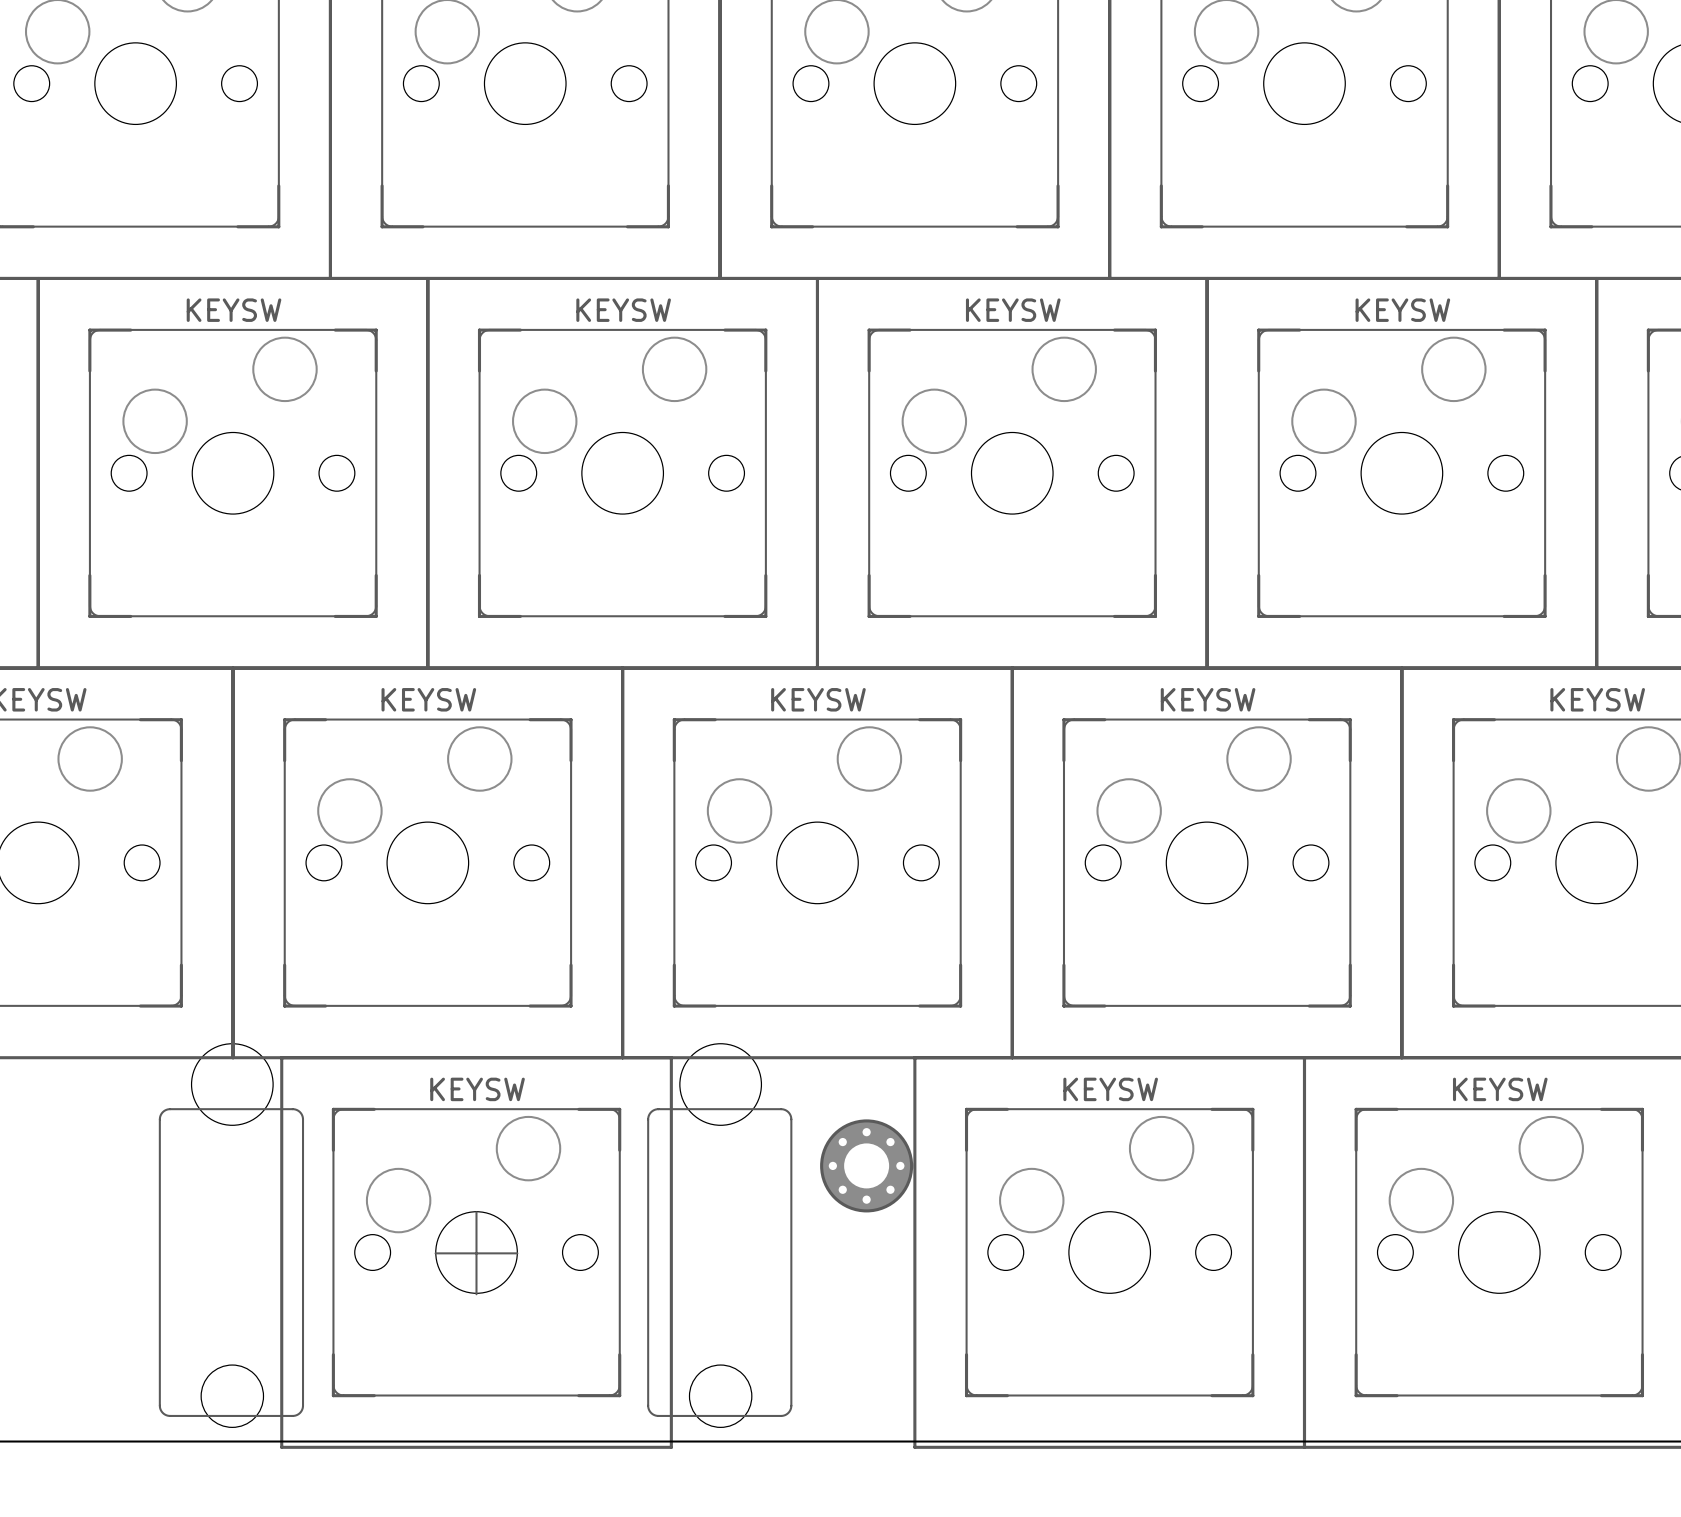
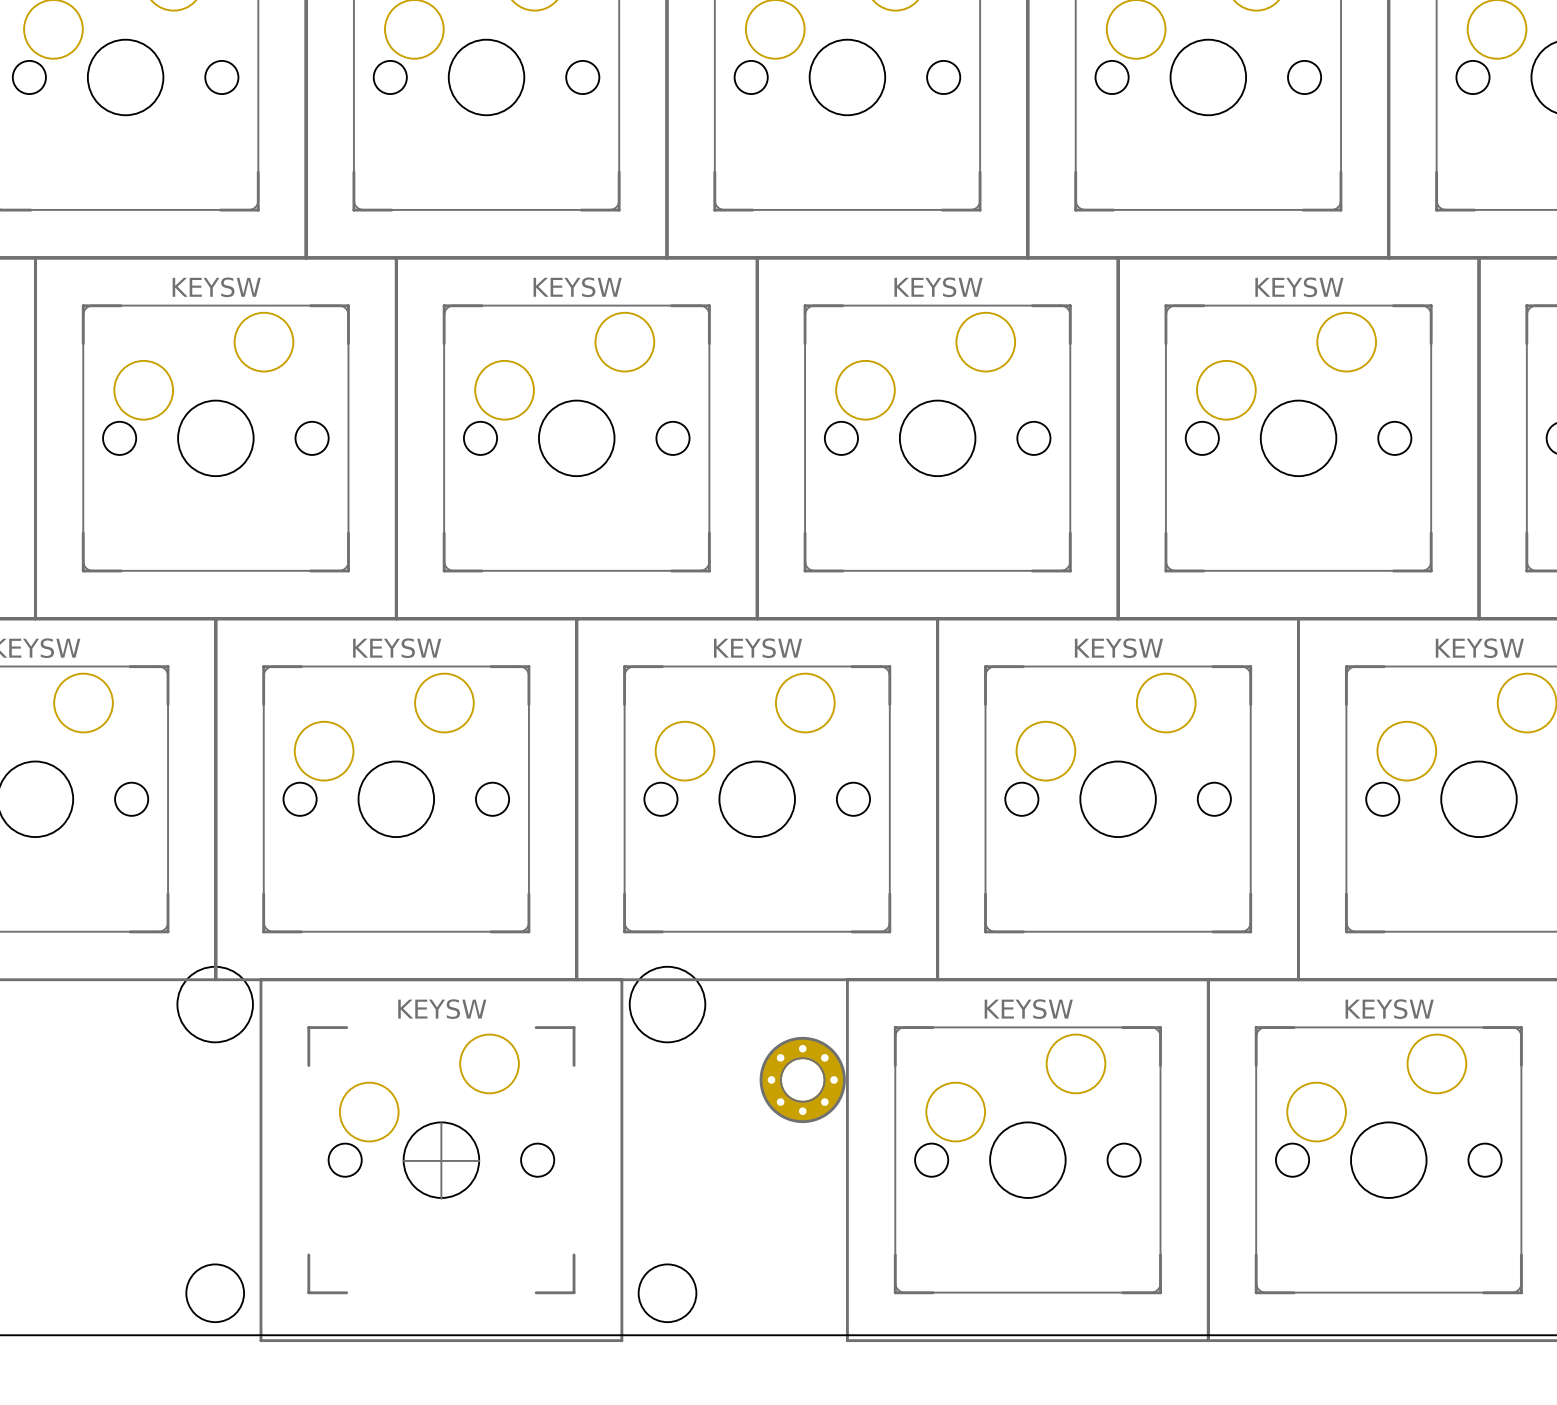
line: (170, 1109) (292, 1109) (299, 1111) (302, 1115) (303, 1405) (300, 1411) (296, 1415) (170, 1415) (163, 1413) (160, 1409) (159, 1119) (162, 1112) (170, 1109) -> none
line: (343, 1109) (609, 1109) (616, 1112) (619, 1119) (619, 1385) (616, 1392) (609, 1395) (343, 1395) (336, 1392) (333, 1385) (333, 1119) (336, 1112) (343, 1109) -> none
line: (658, 1109) (781, 1109) (787, 1111) (790, 1115) (791, 1405) (789, 1411) (785, 1415) (658, 1415) (652, 1413) (648, 1409) (648, 1119) (651, 1112) (658, 1109) -> none
drawing: none -> [780, 1057, 826, 1103]

